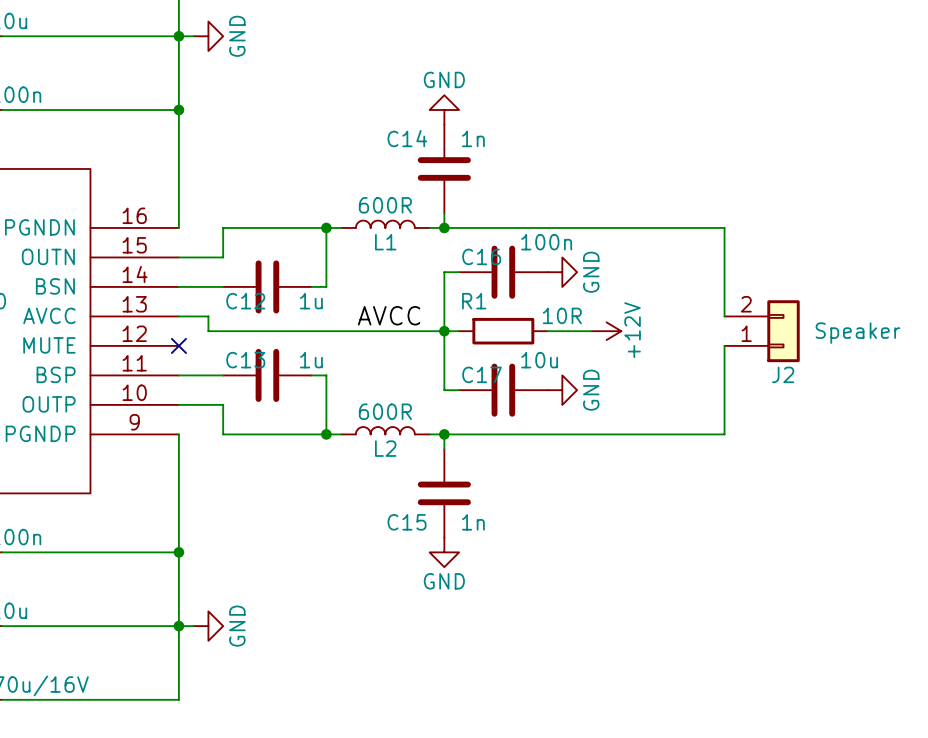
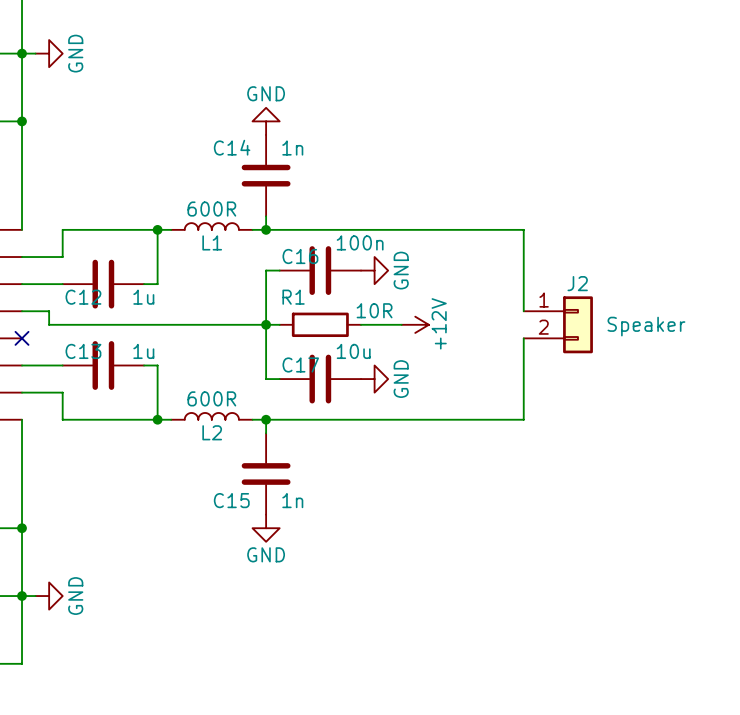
label: AVCC (389, 315) -> none
J2 flip: as is (783, 331) -> up-down (577, 324)

